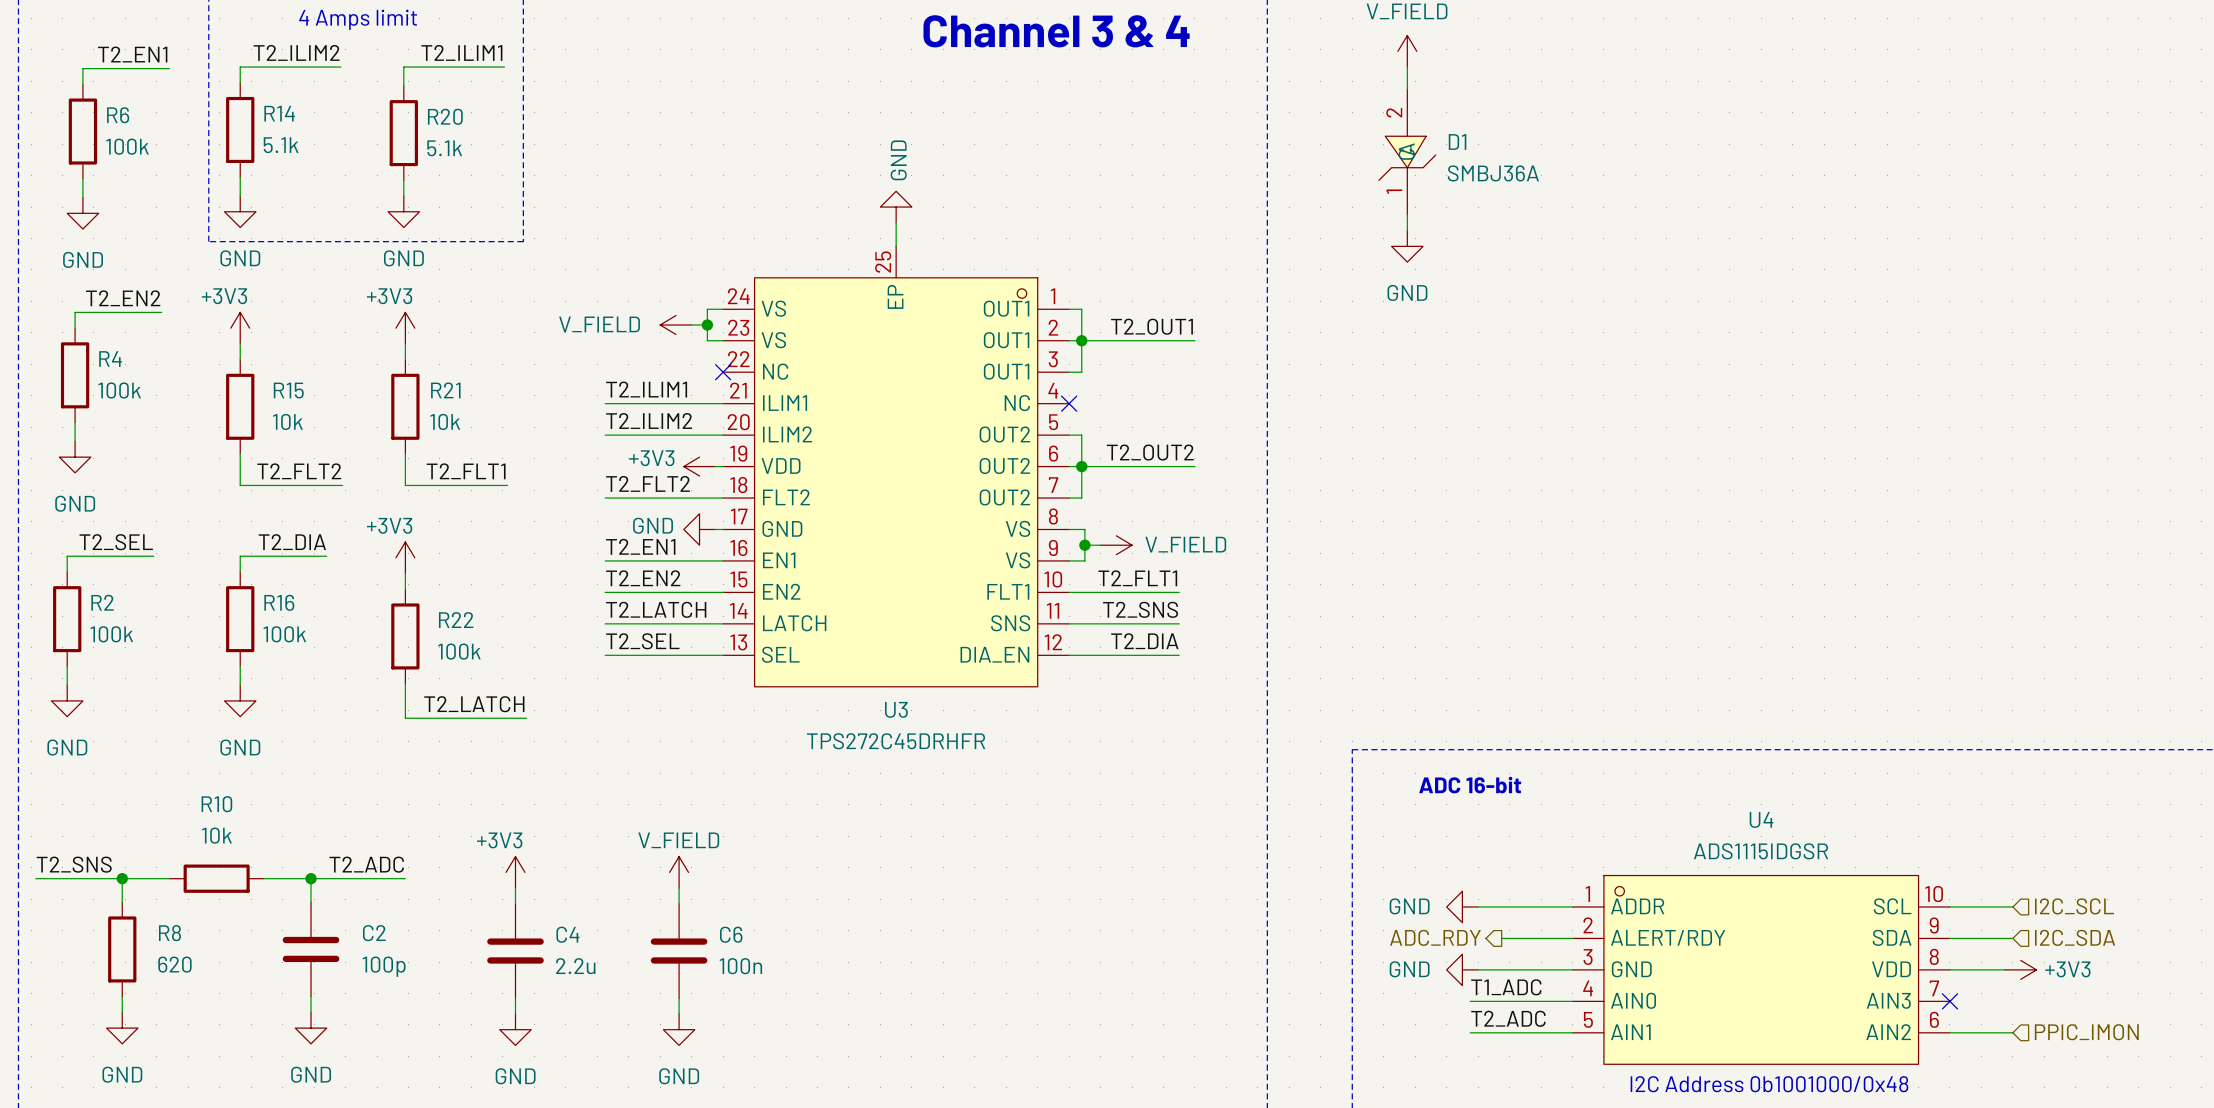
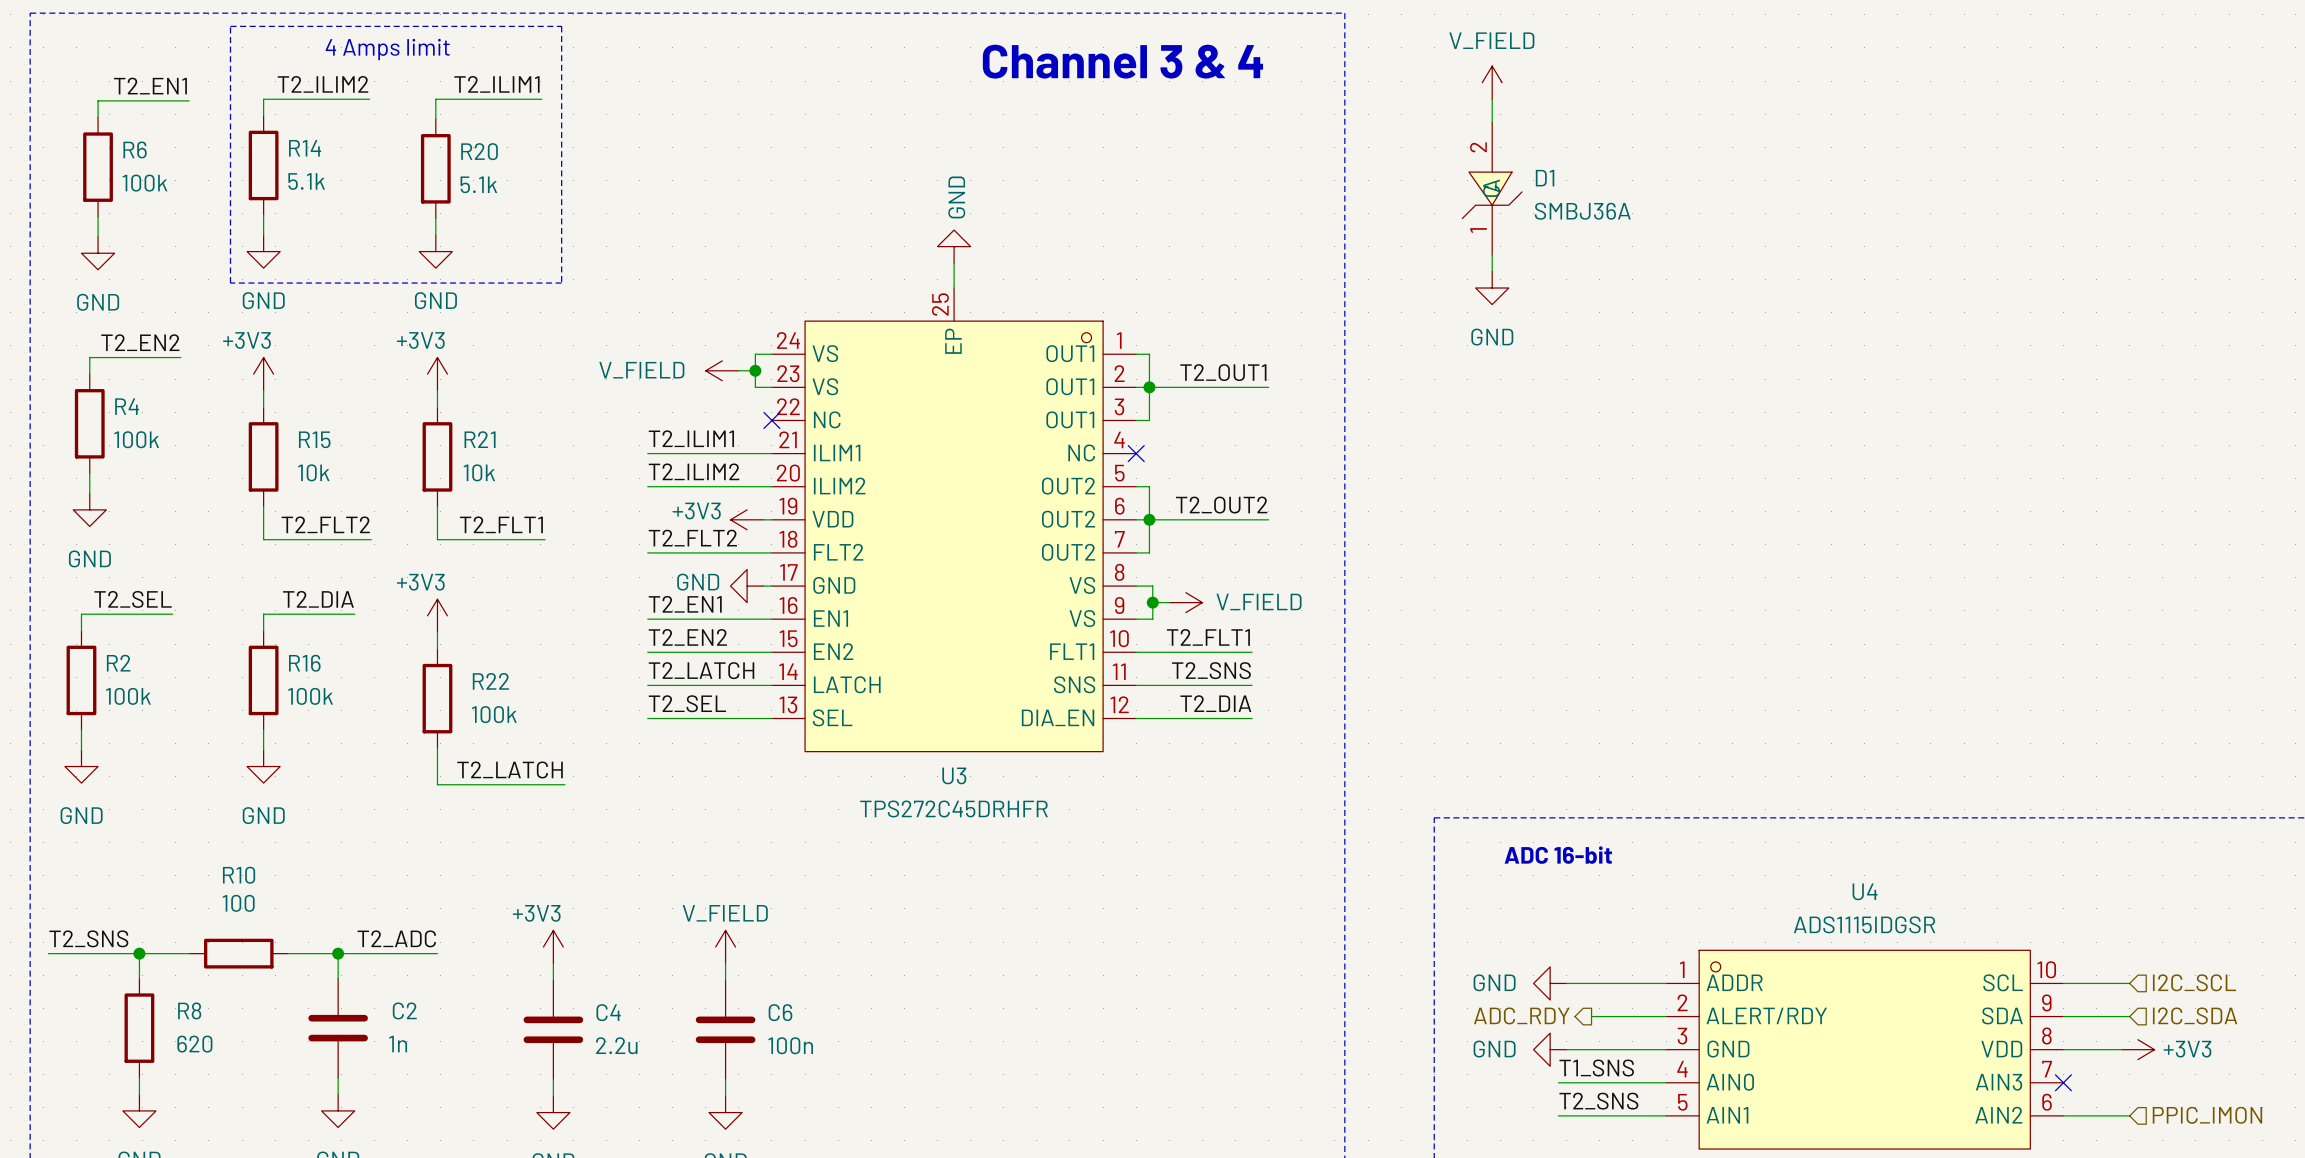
R10 value: 10k (216, 835) -> 100 (238, 903)
C2 value: 100p (384, 966) -> 1n (398, 1044)
label: T1_ADC (1506, 987) -> T1_SNS (1596, 1068)
label: T2_ADC (1508, 1018) -> T2_SNS (1598, 1101)

